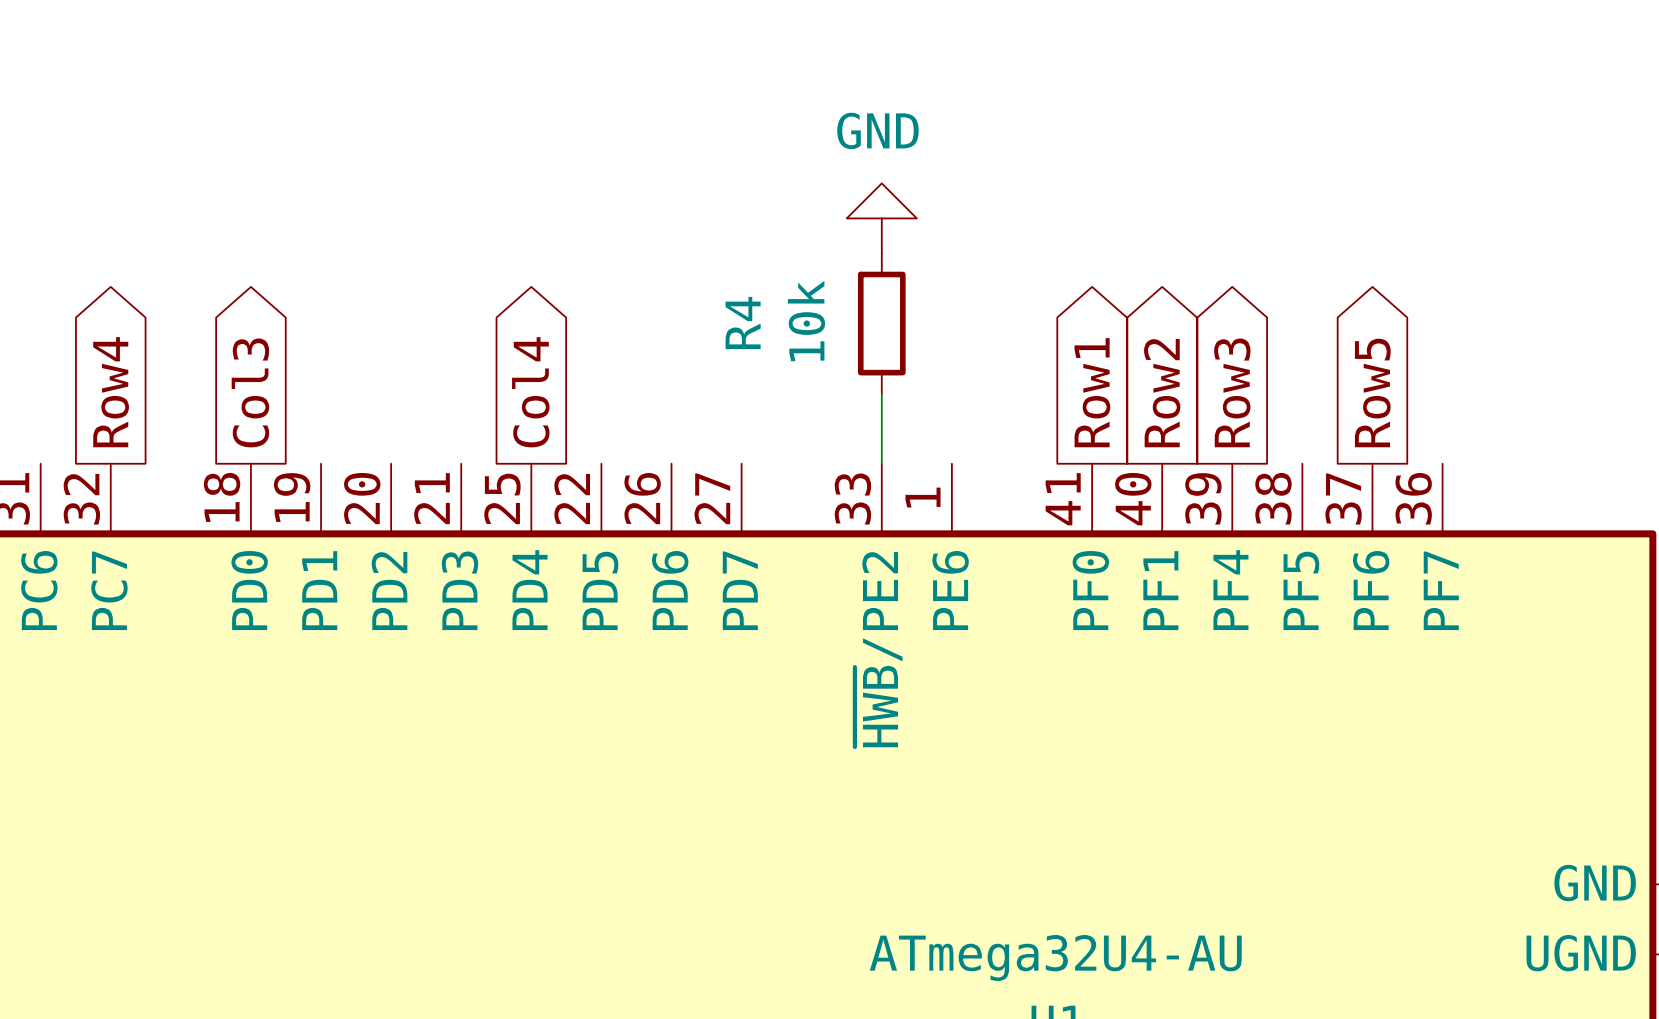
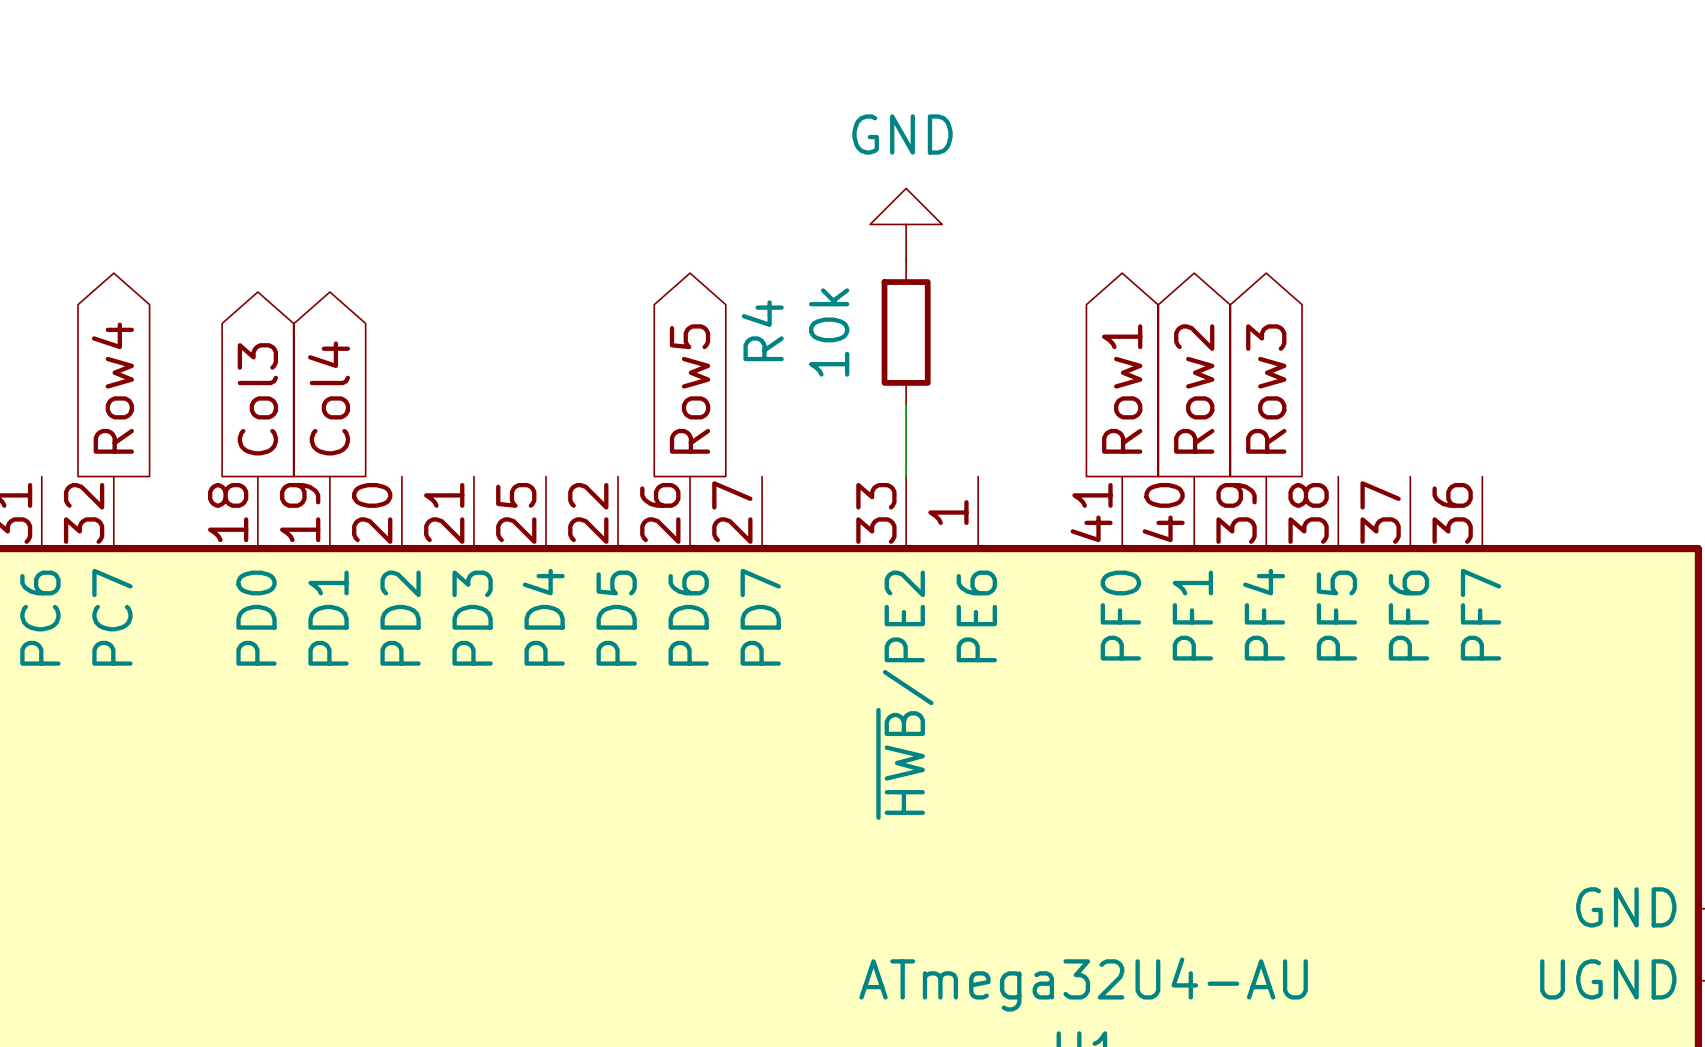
global label position: Col4 (530, 392) -> Col4 (329, 398)
global label: none -> Row5 (690, 389)
global label: Row5 (1372, 392) -> none

